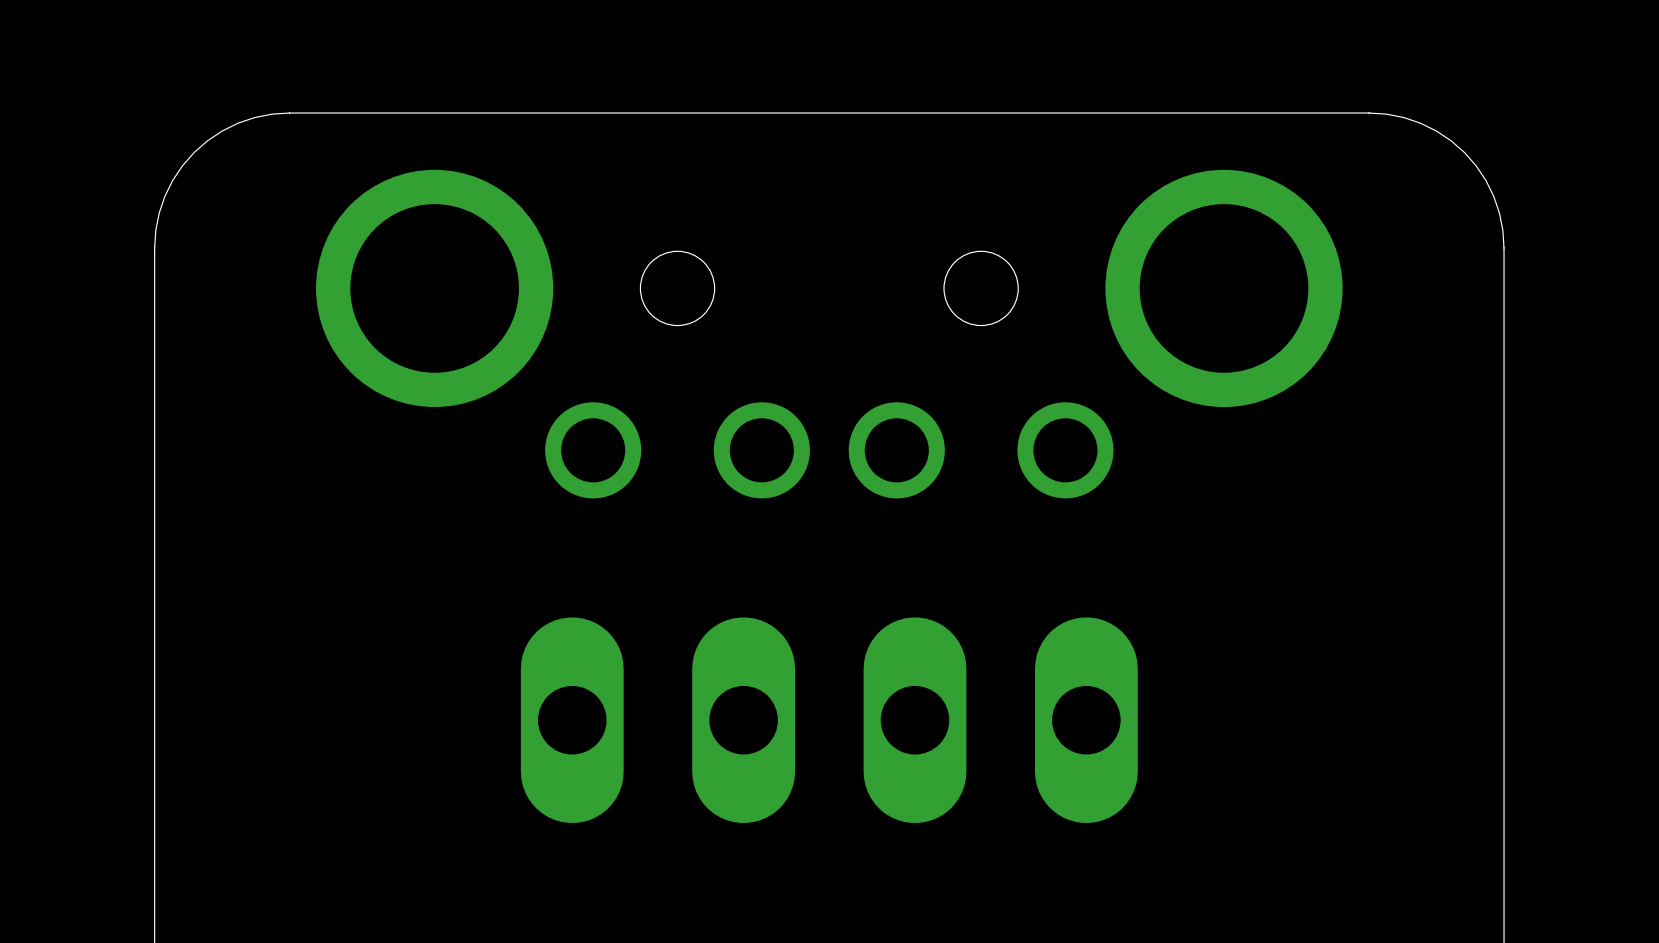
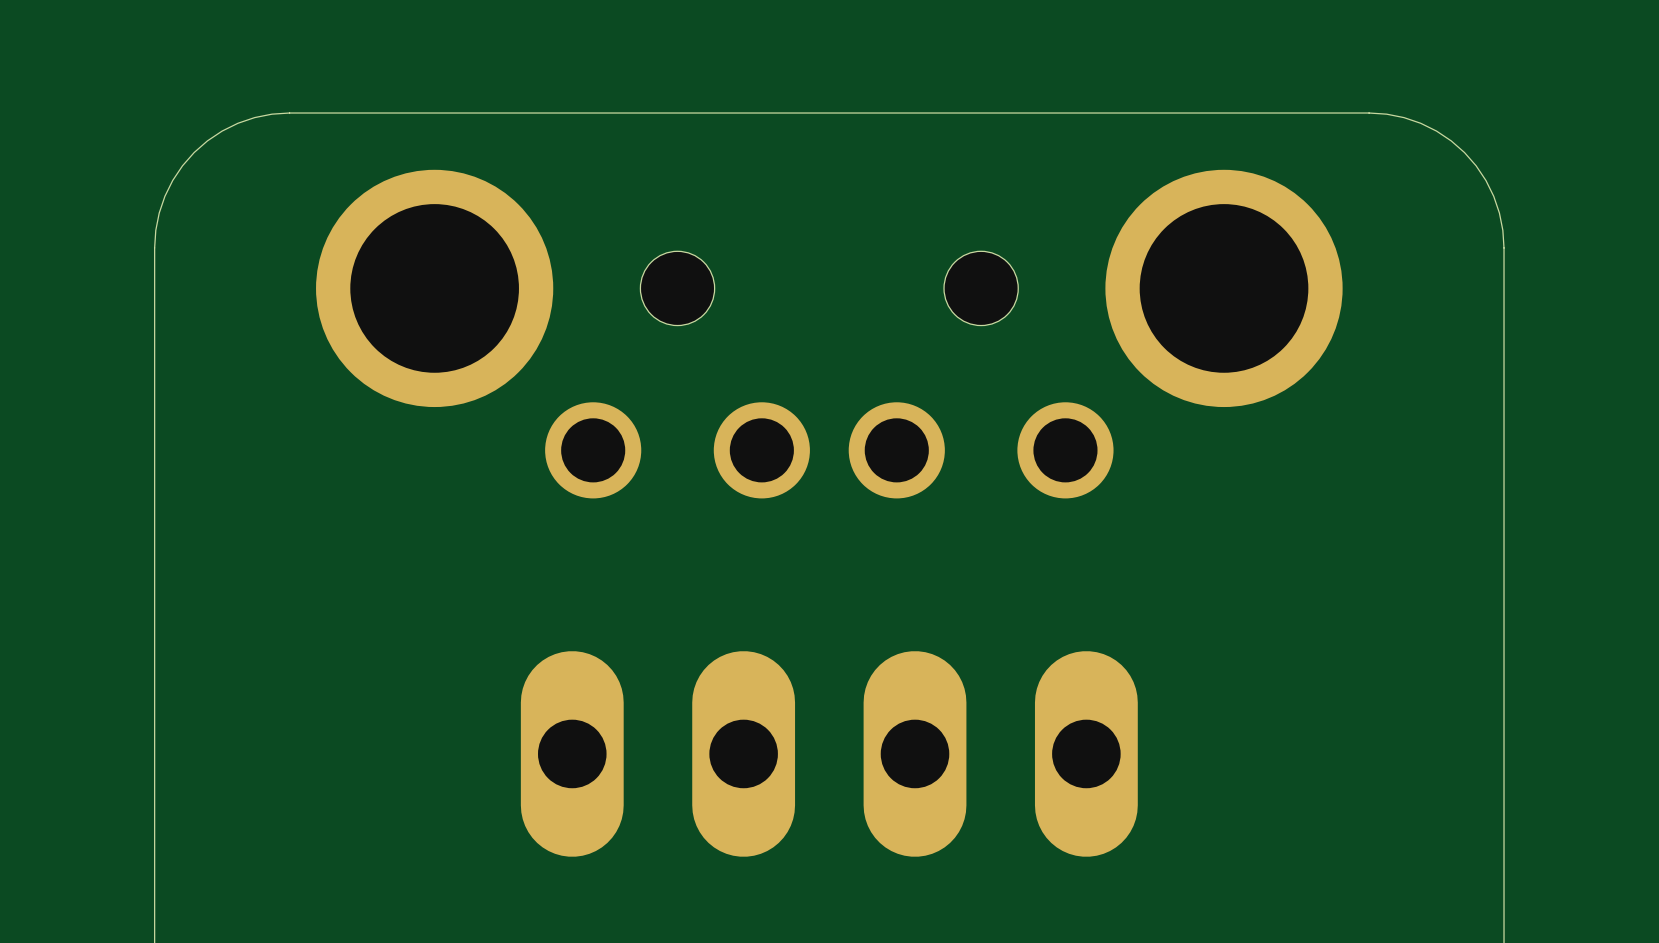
part position: (829, 720) -> (829, 753)

